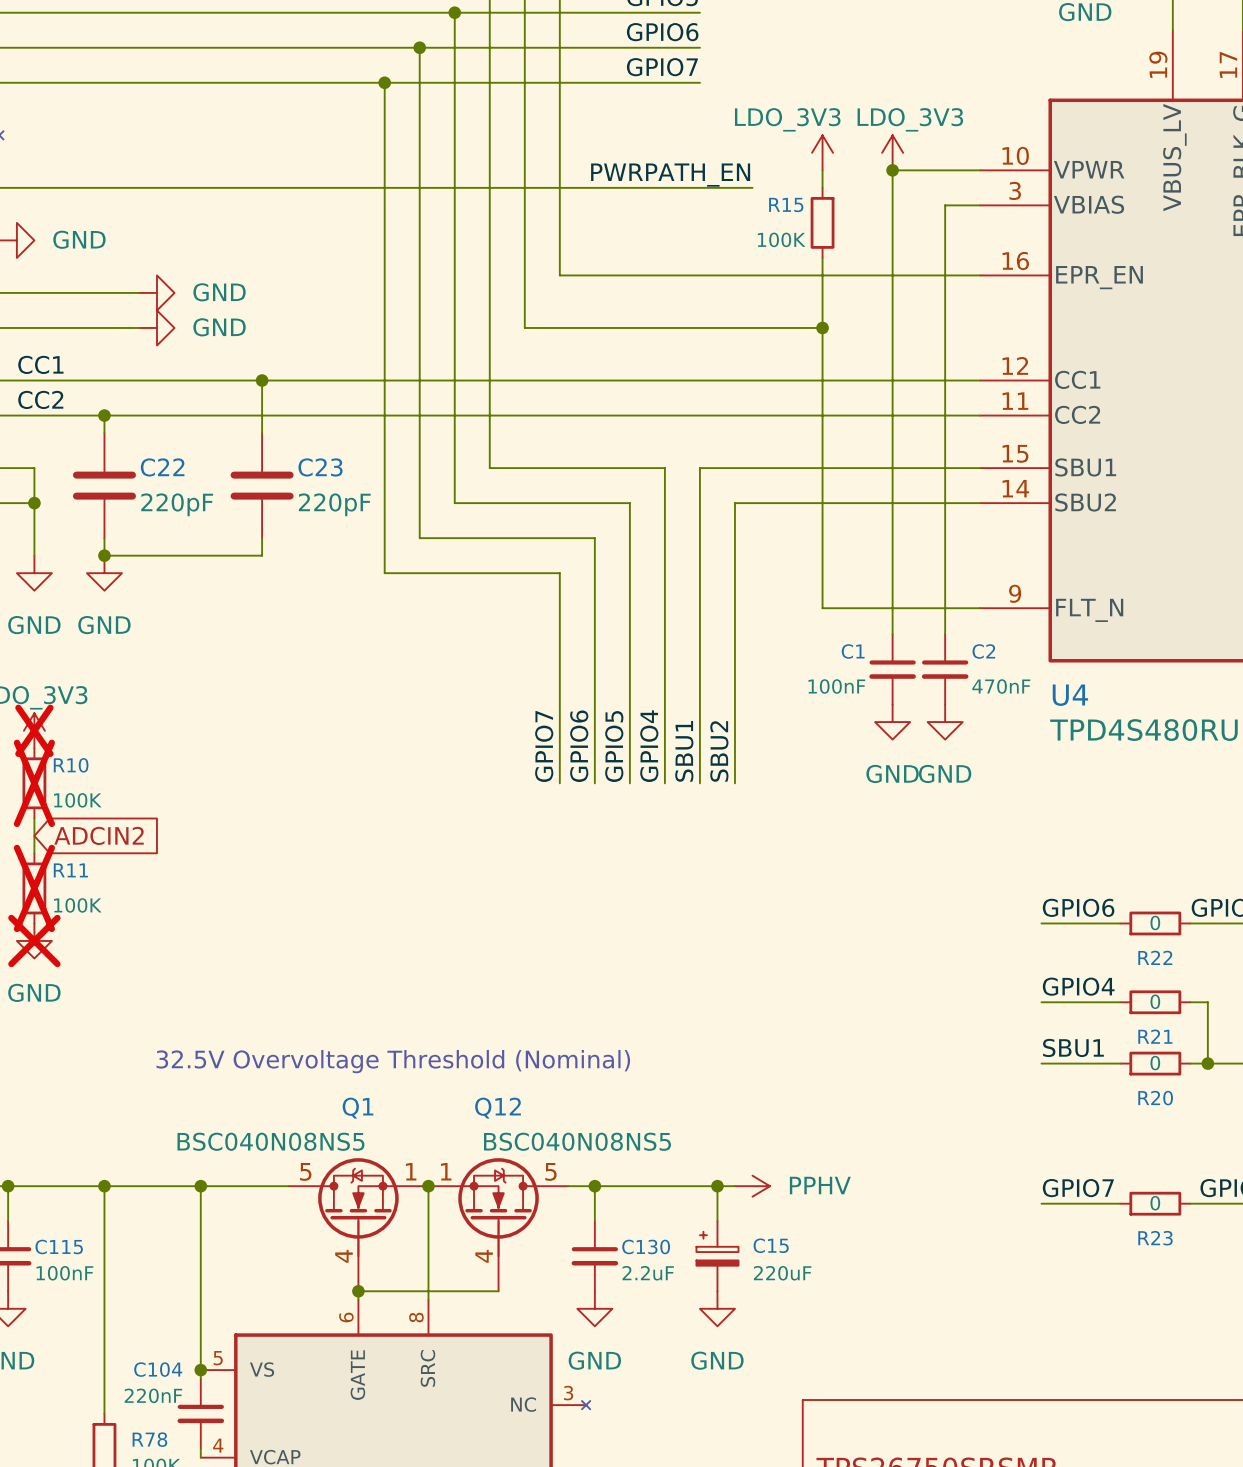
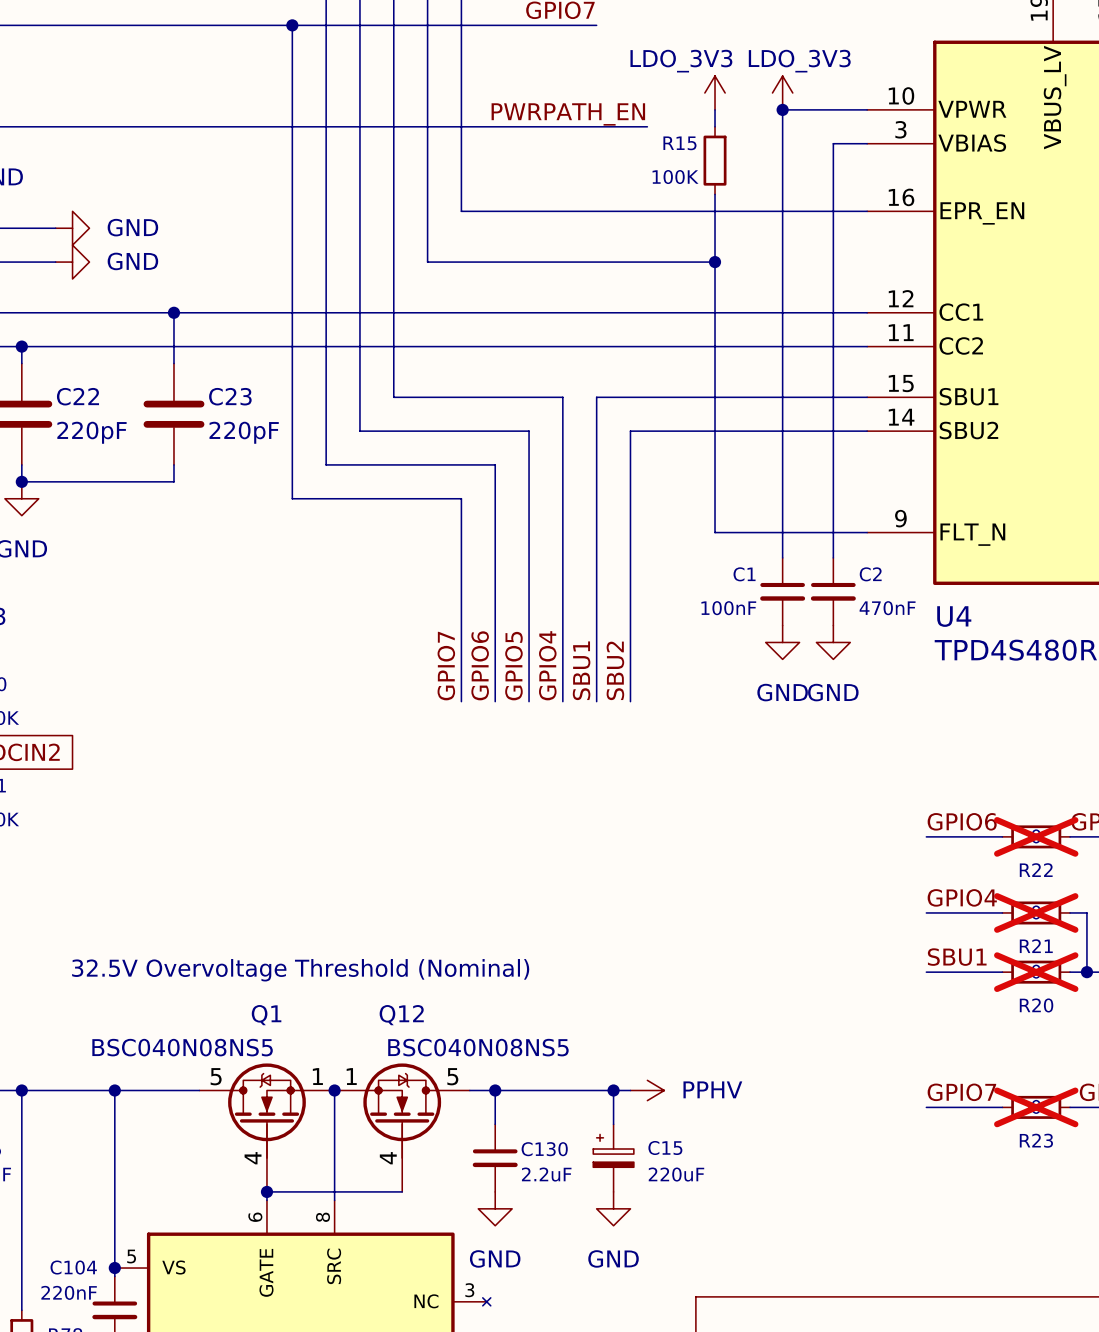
R22 do-not-place cross: none -> (1036, 836)
R21 do-not-place cross: none -> (1036, 912)
R20 do-not-place cross: none -> (1036, 972)
R23 do-not-place cross: none -> (1036, 1107)

